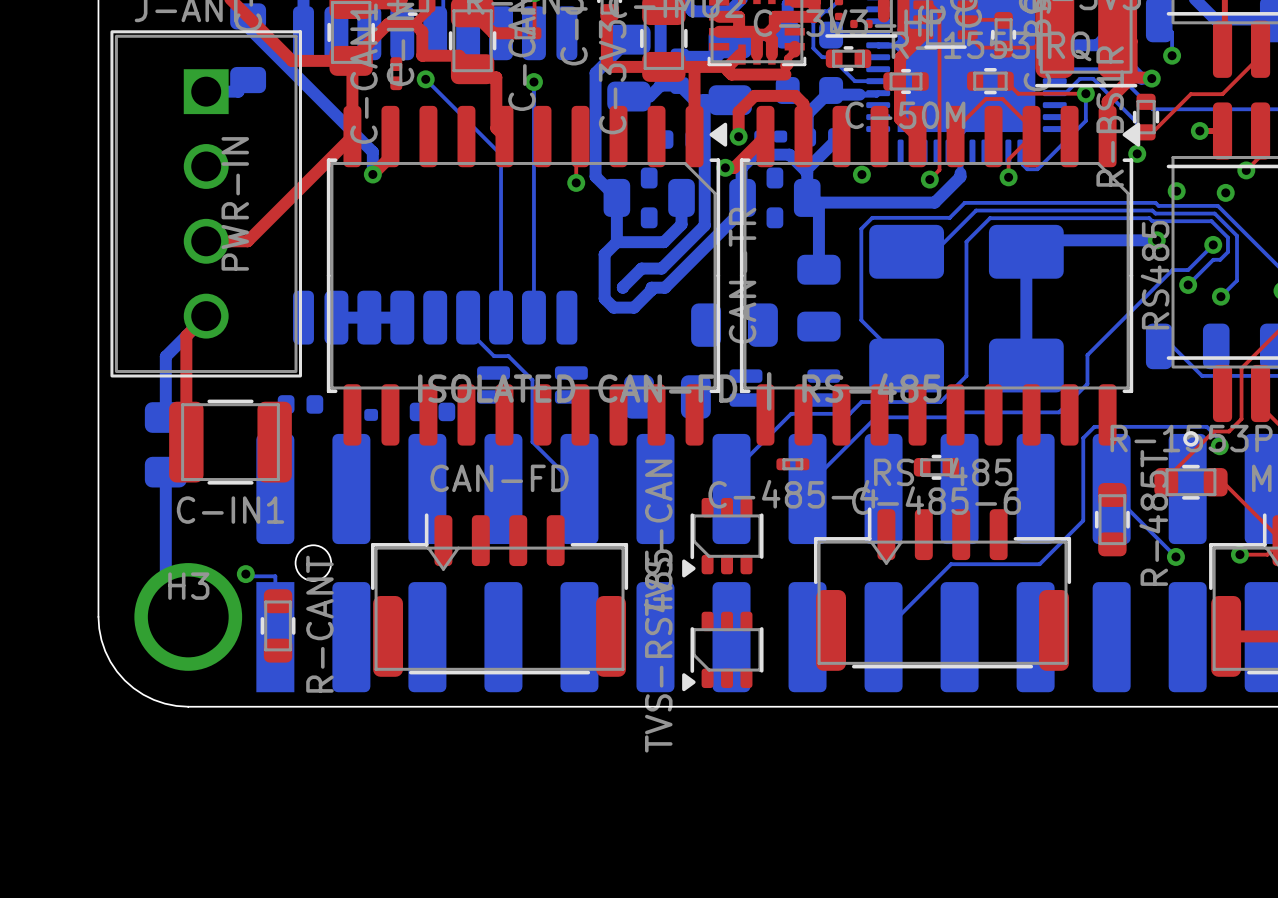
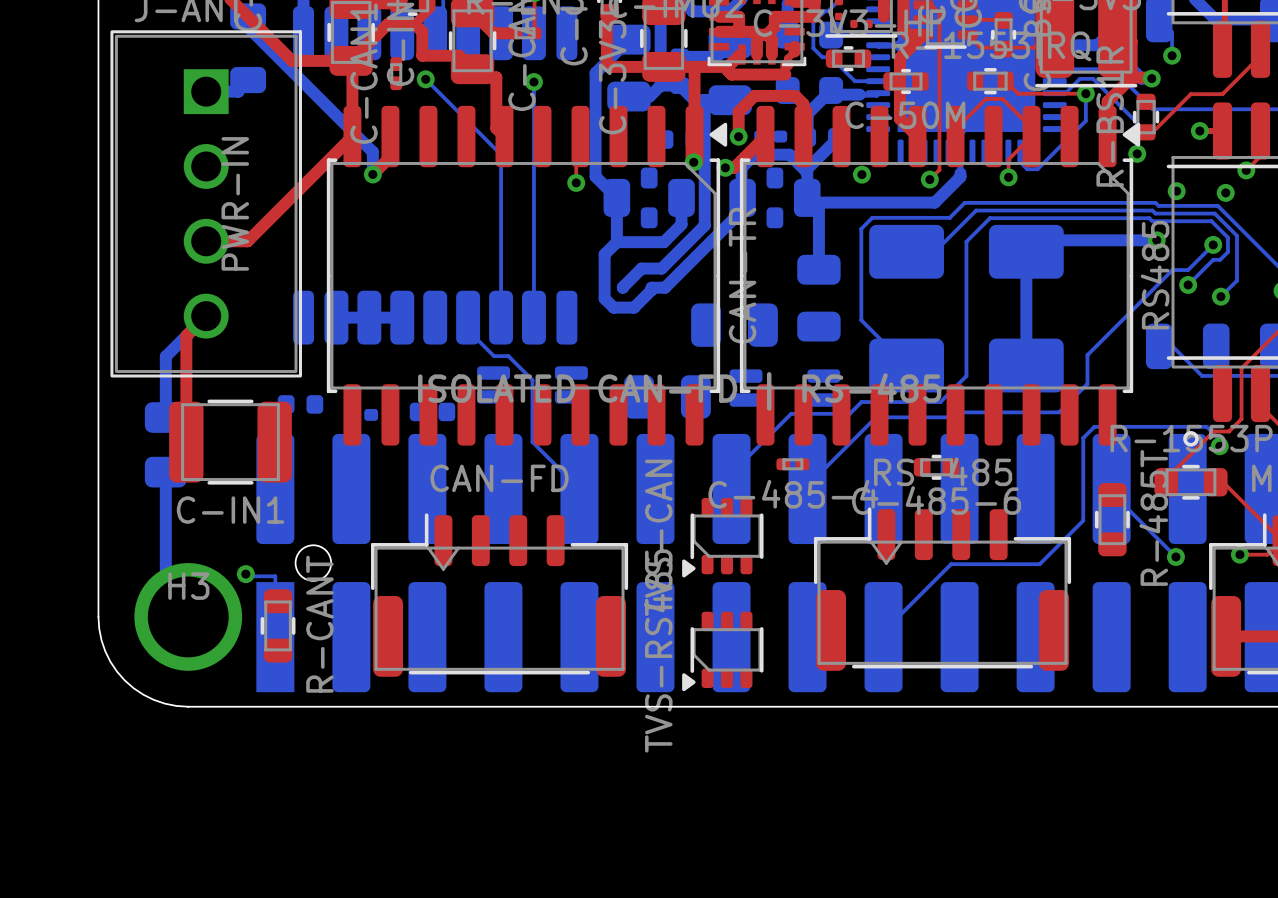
via: none -> (693, 162)

